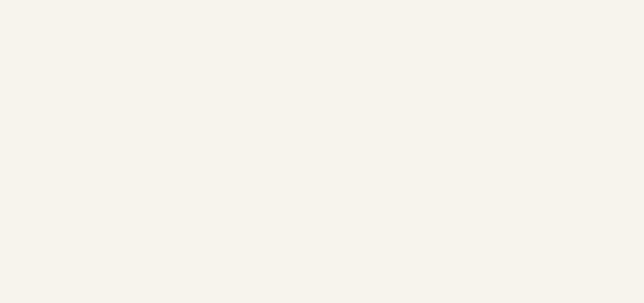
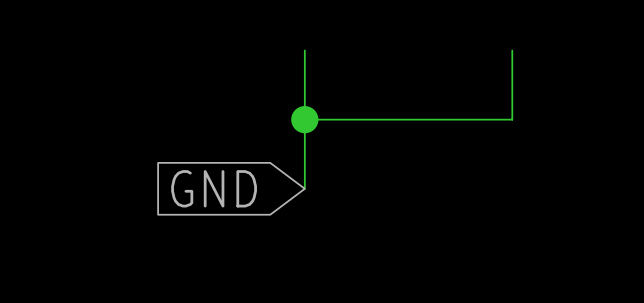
wire: none -> (304, 50) (304, 188)
wire: none -> (512, 50) (512, 119) (304, 119)
junction: none -> (304, 119)
global label: none -> GND (214, 188)

